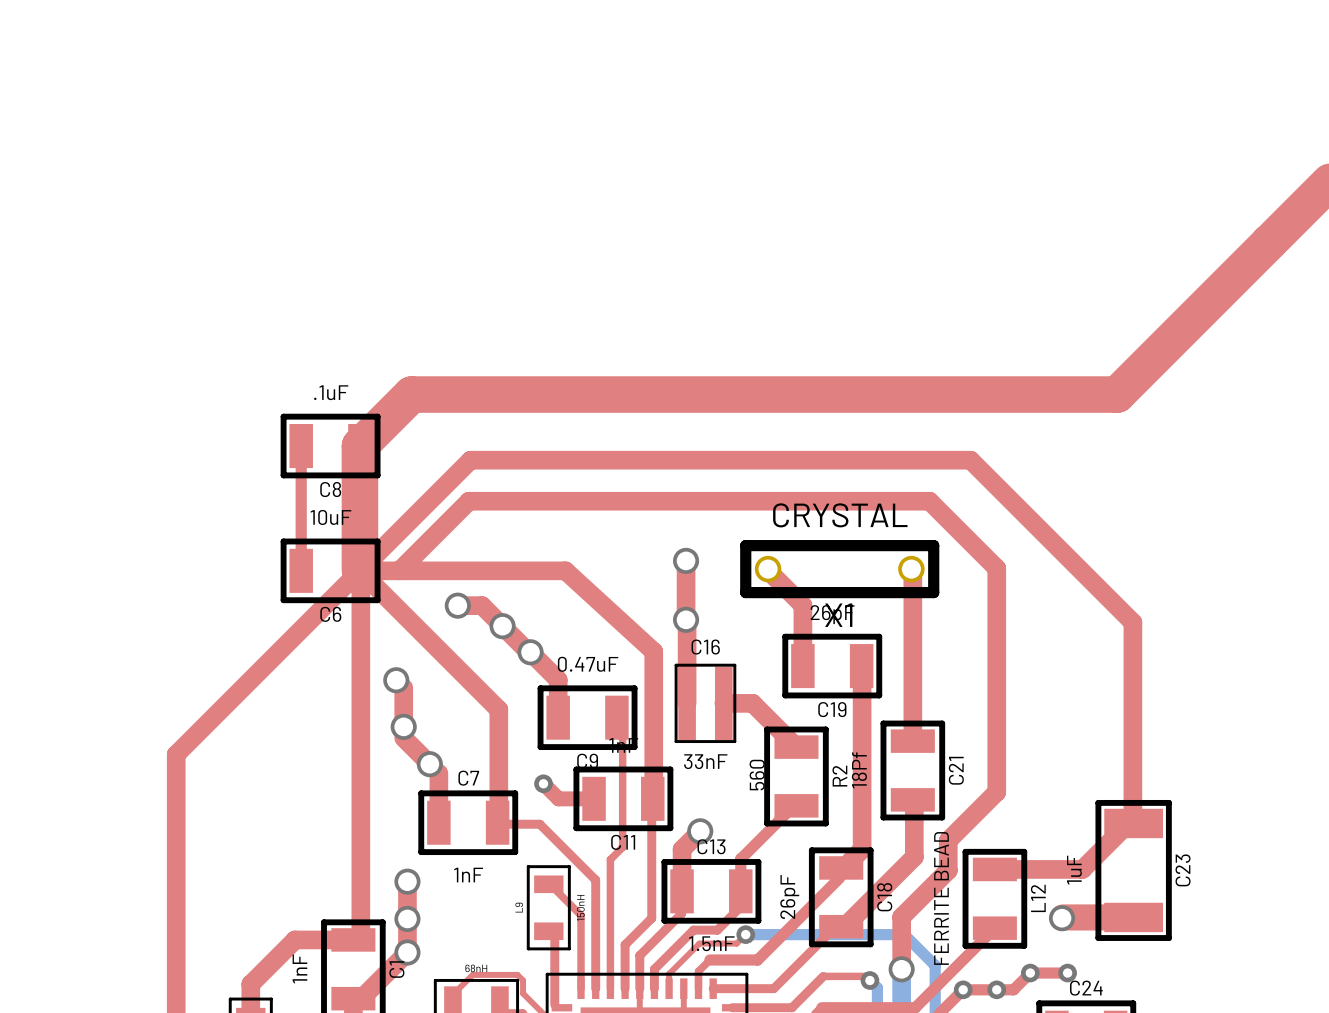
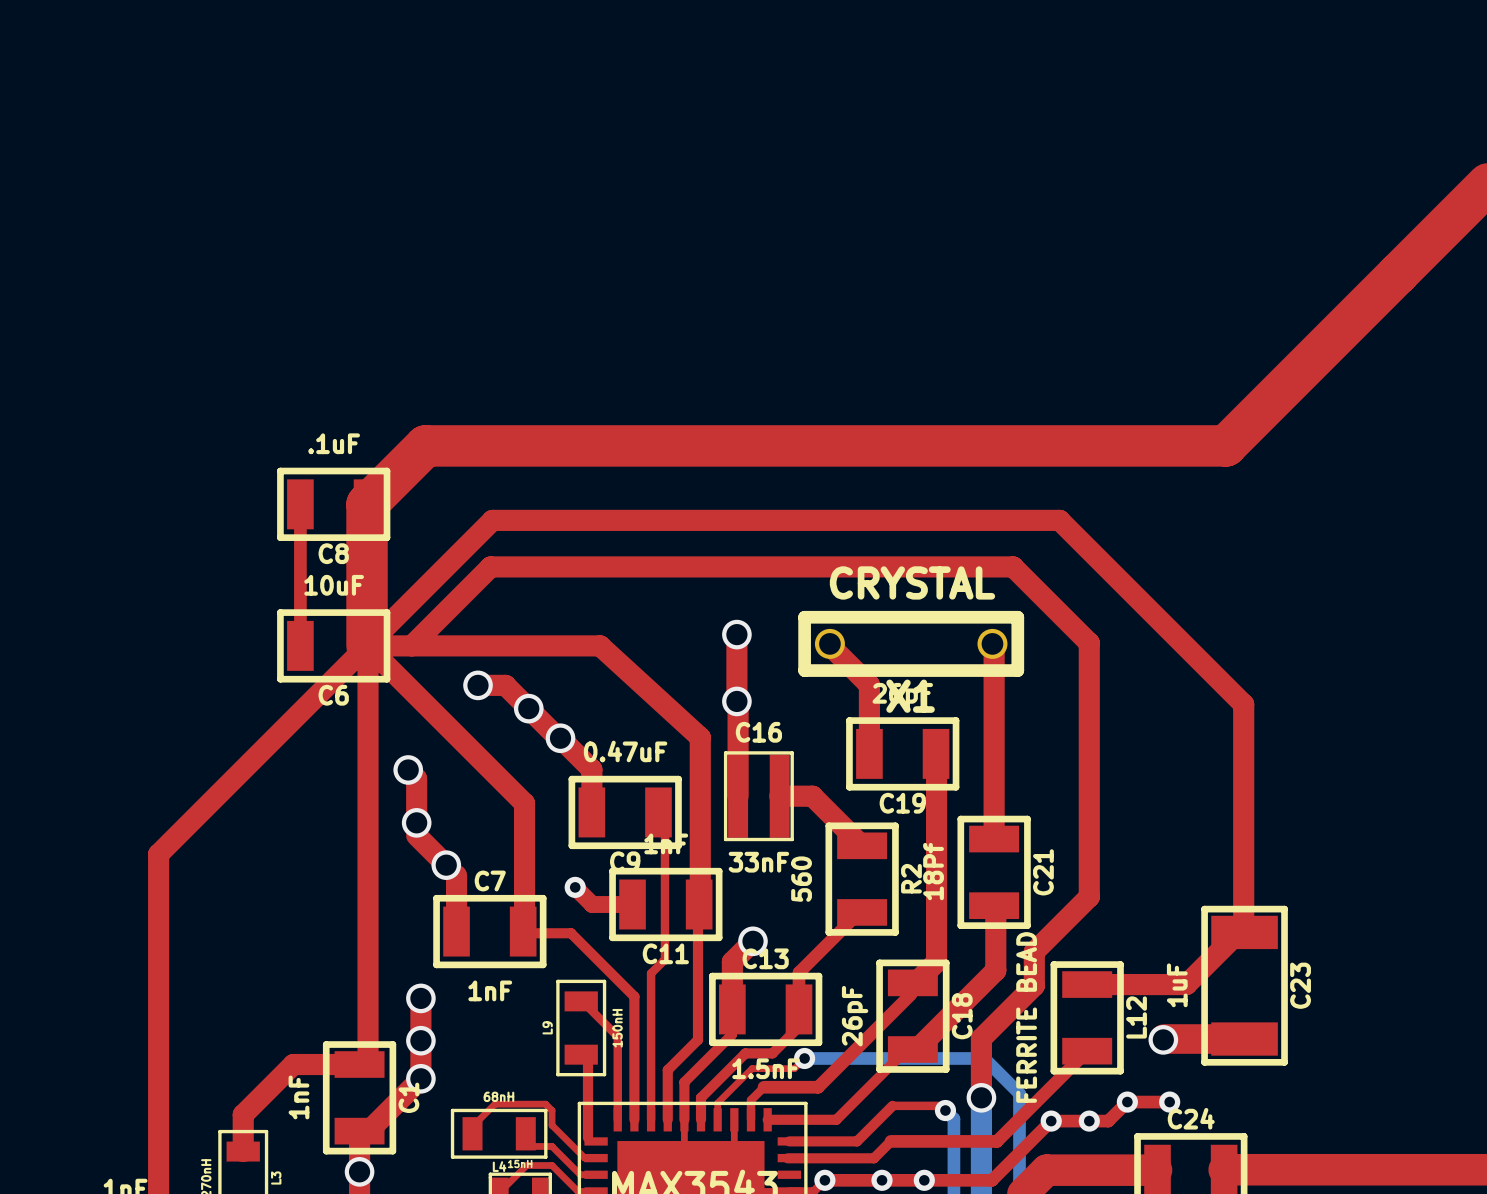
R2 value position: 560 (757, 775) -> 560 (801, 879)

